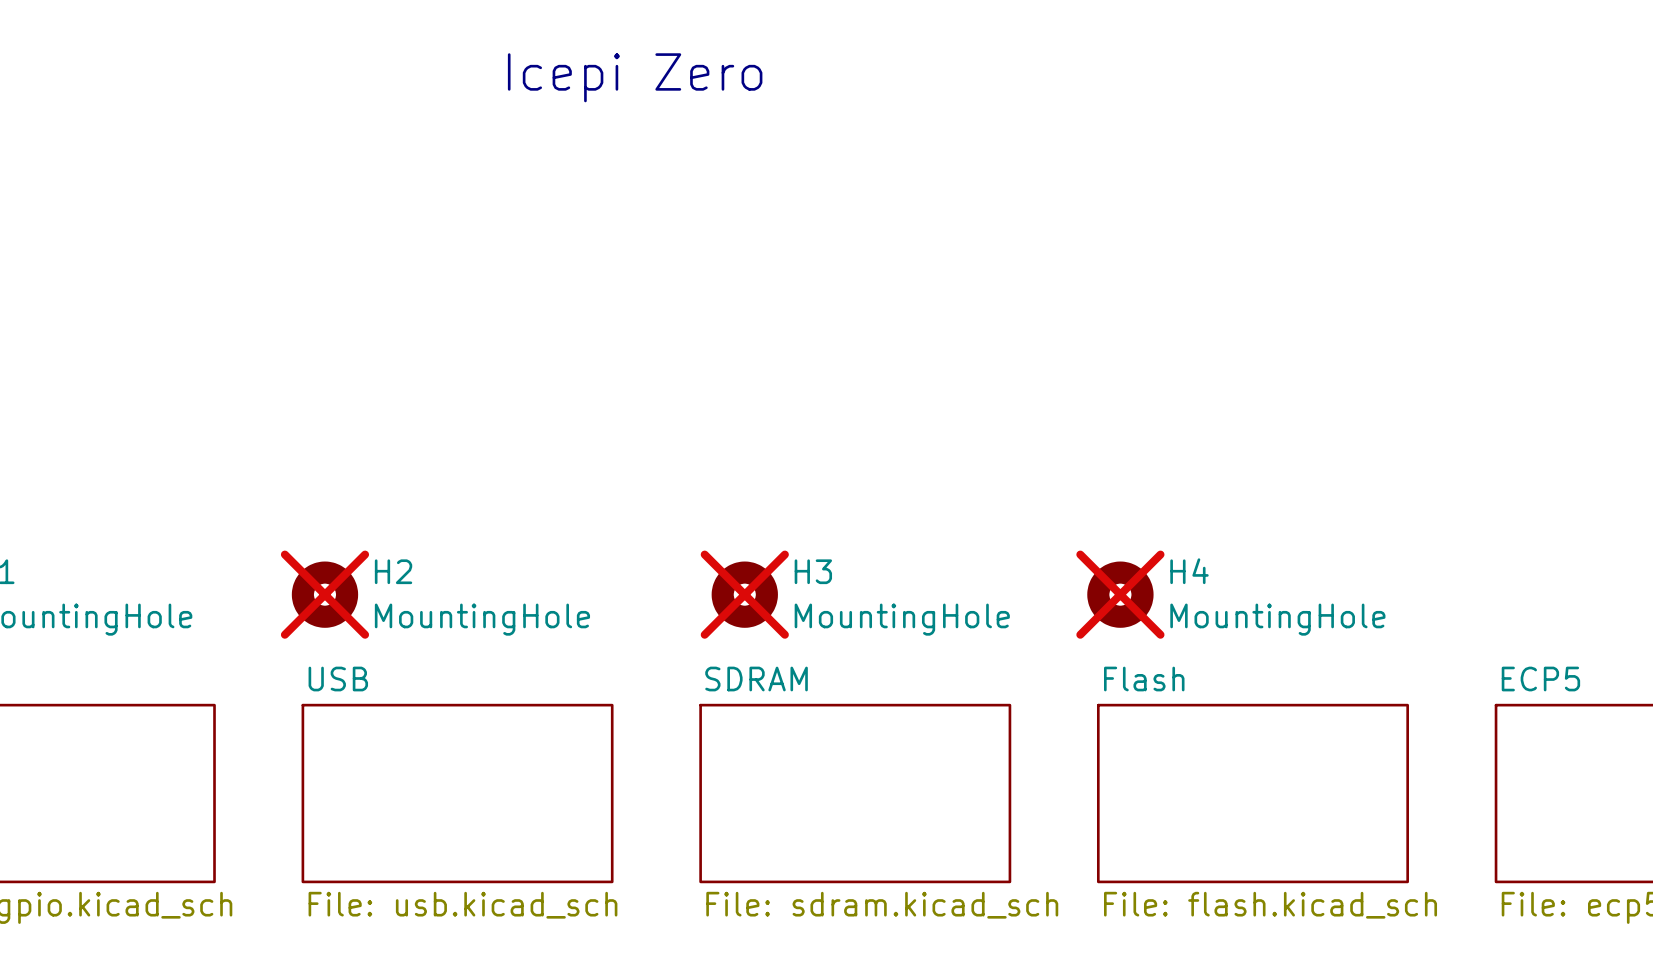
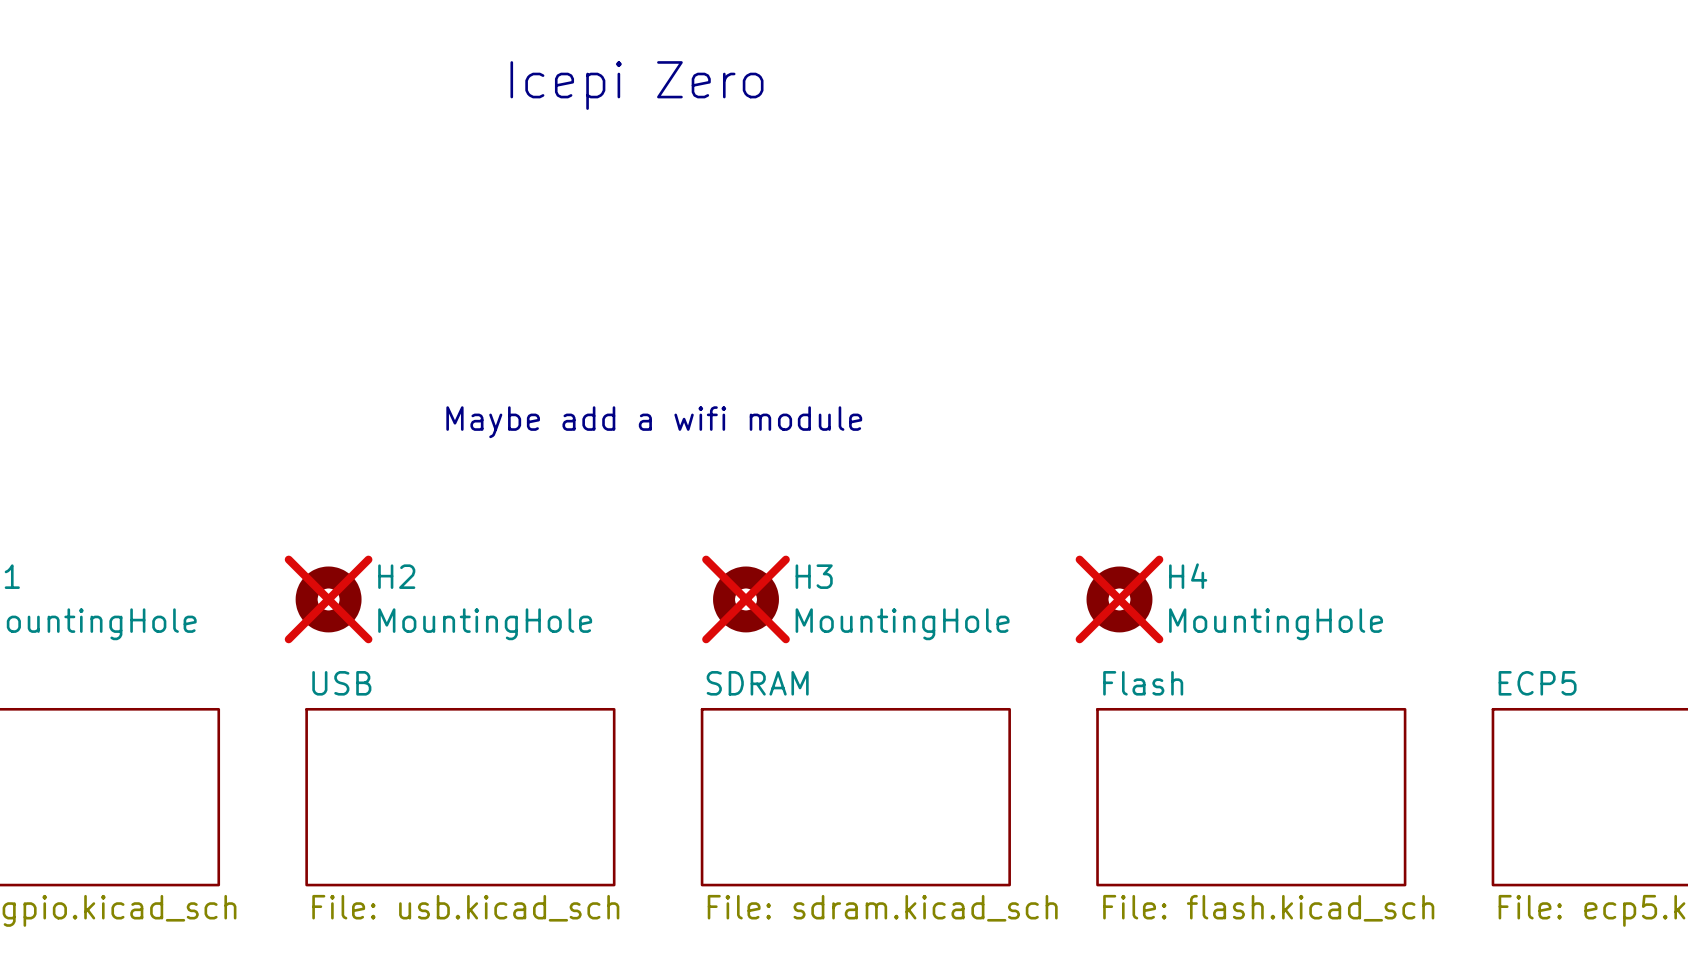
text: none -> Maybe add a wifi module (654, 422)

